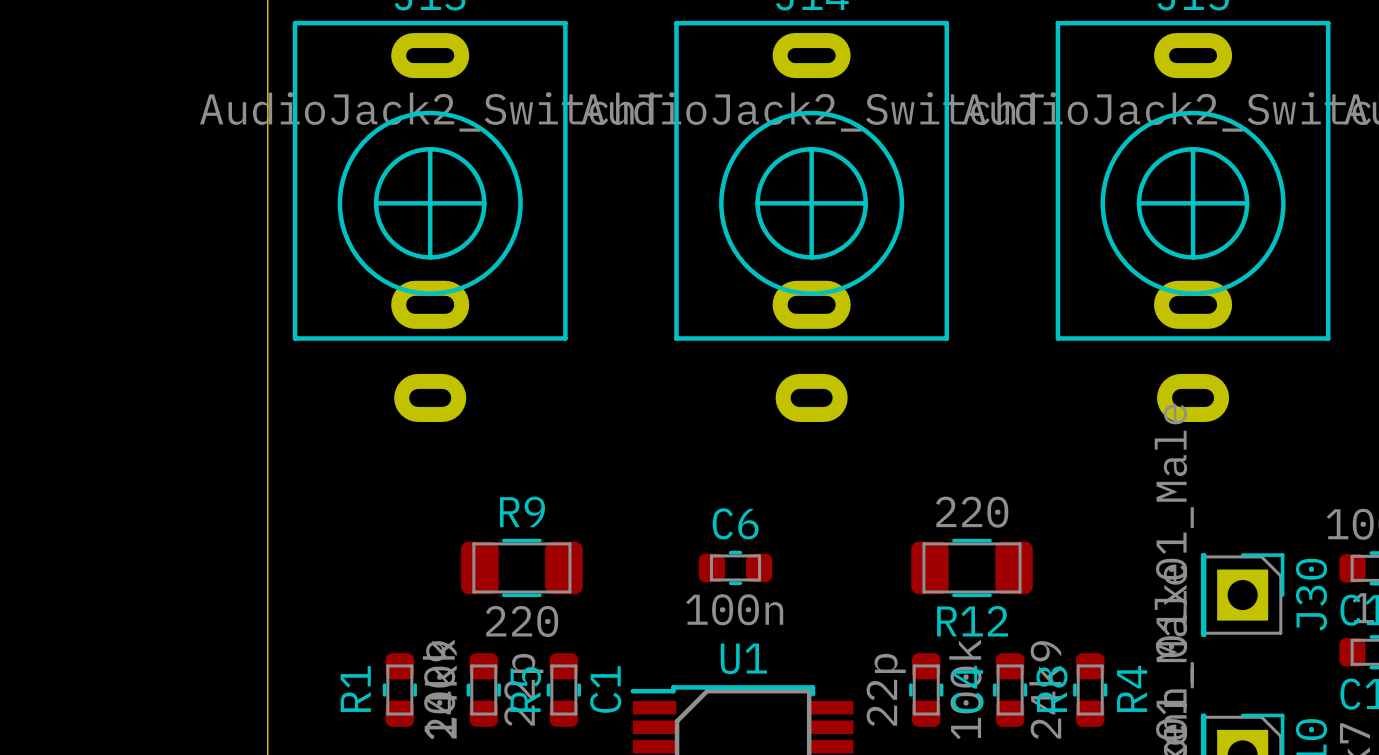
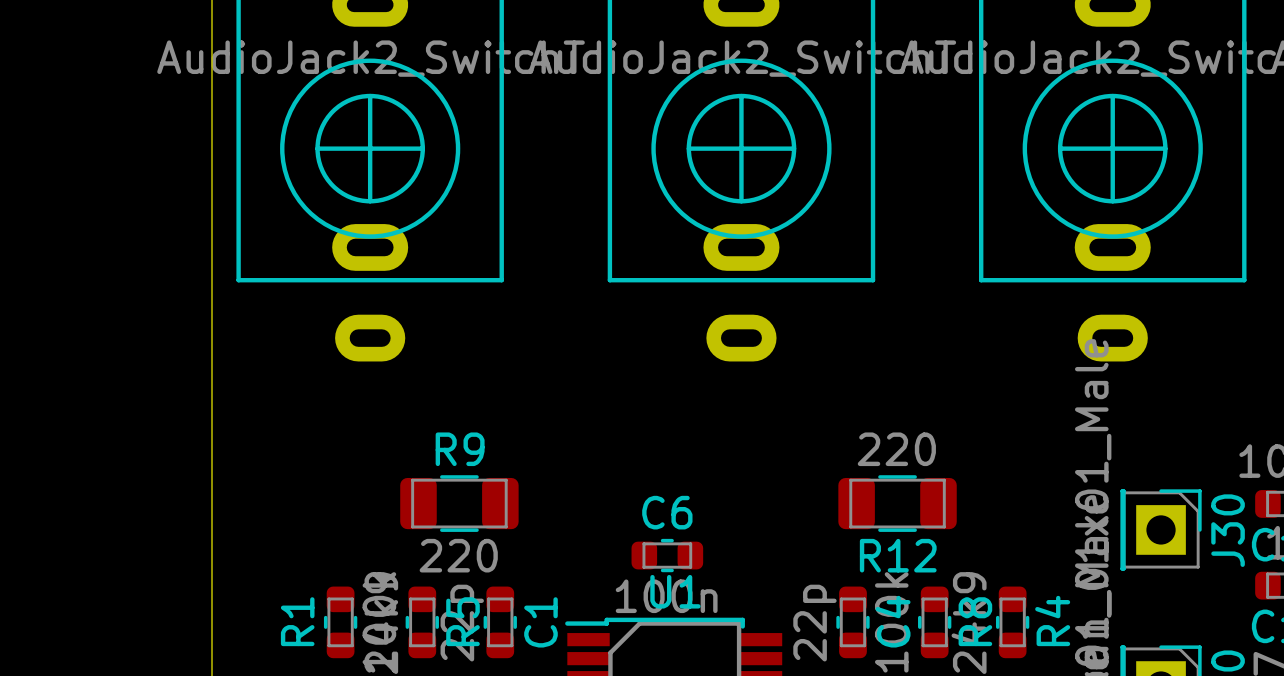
C6 position: (735, 567) -> (667, 555)

